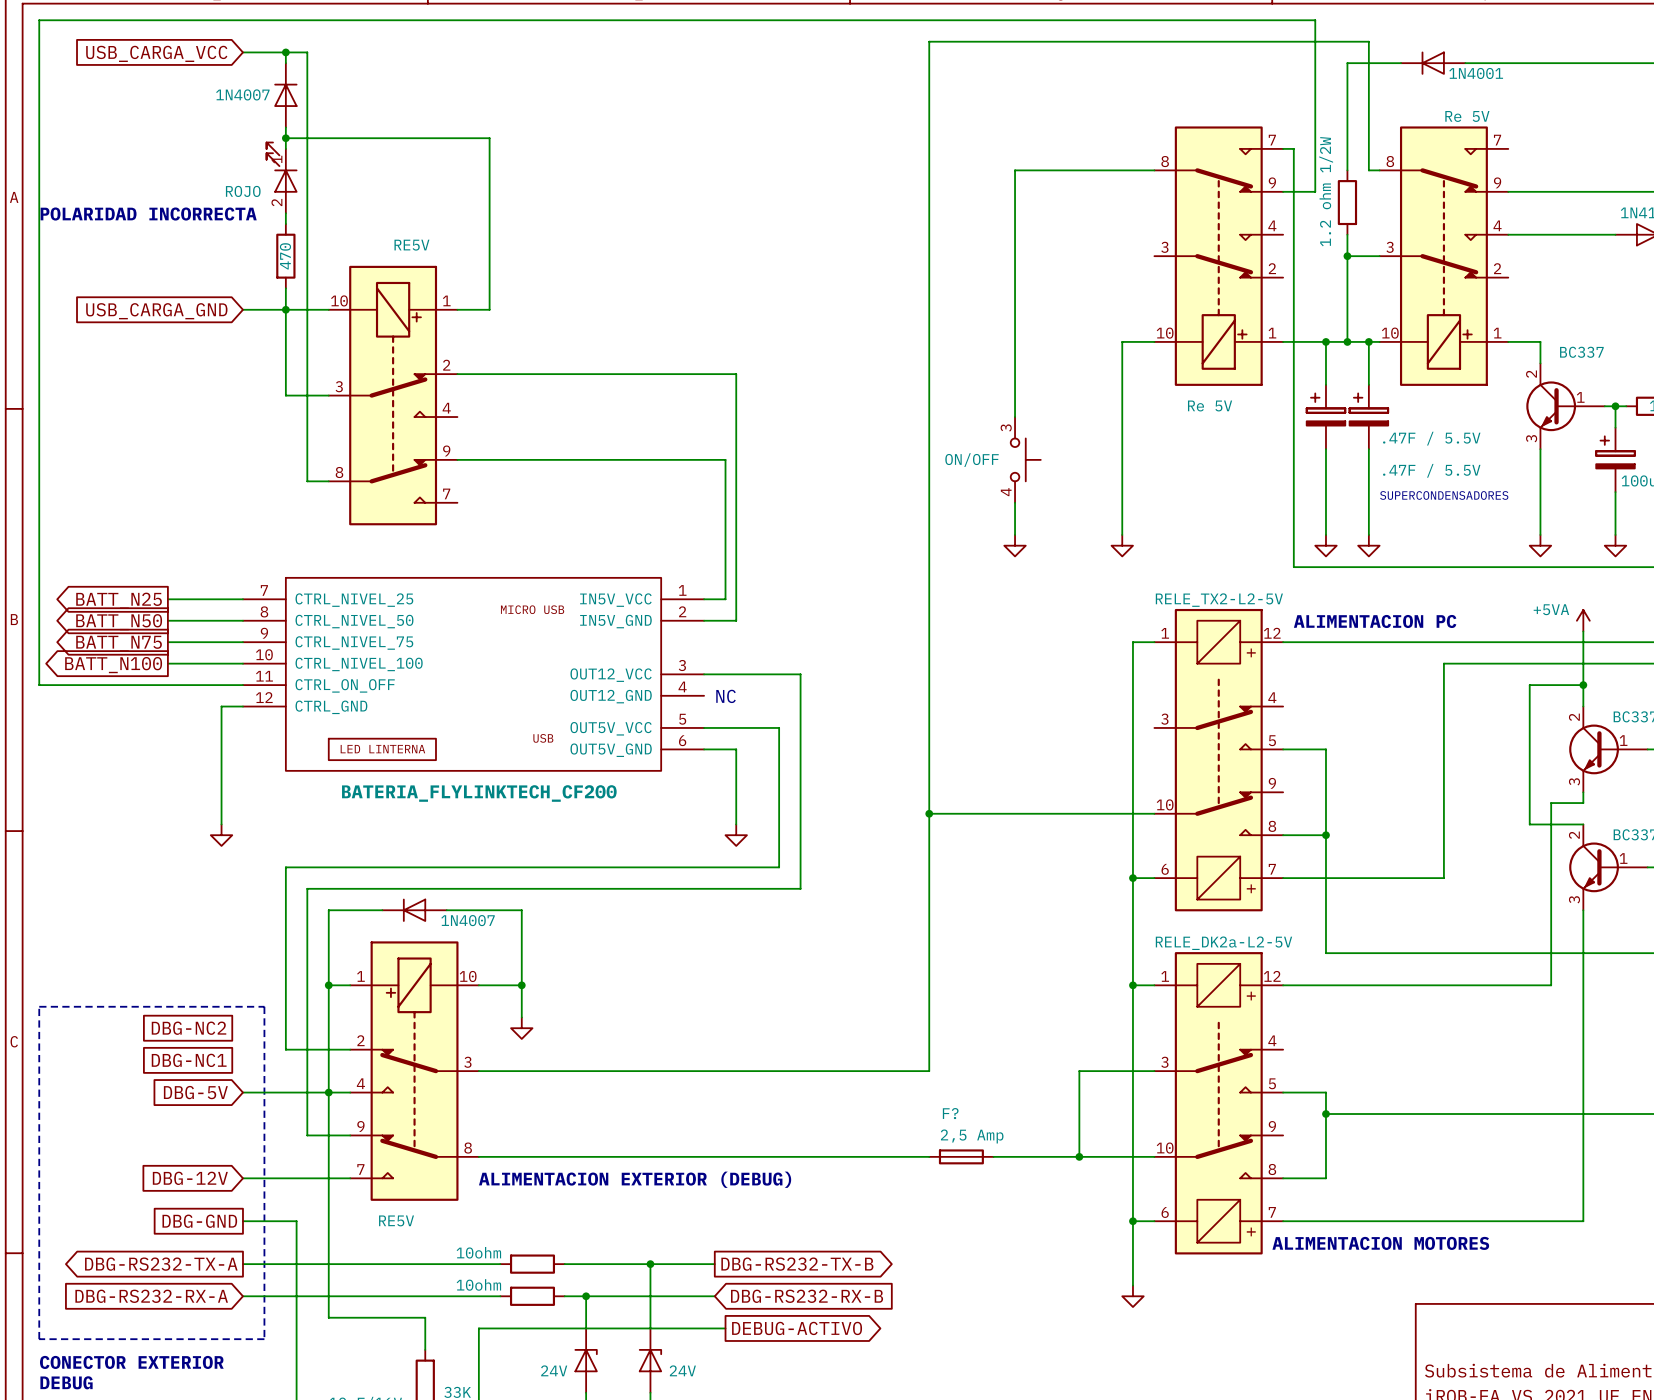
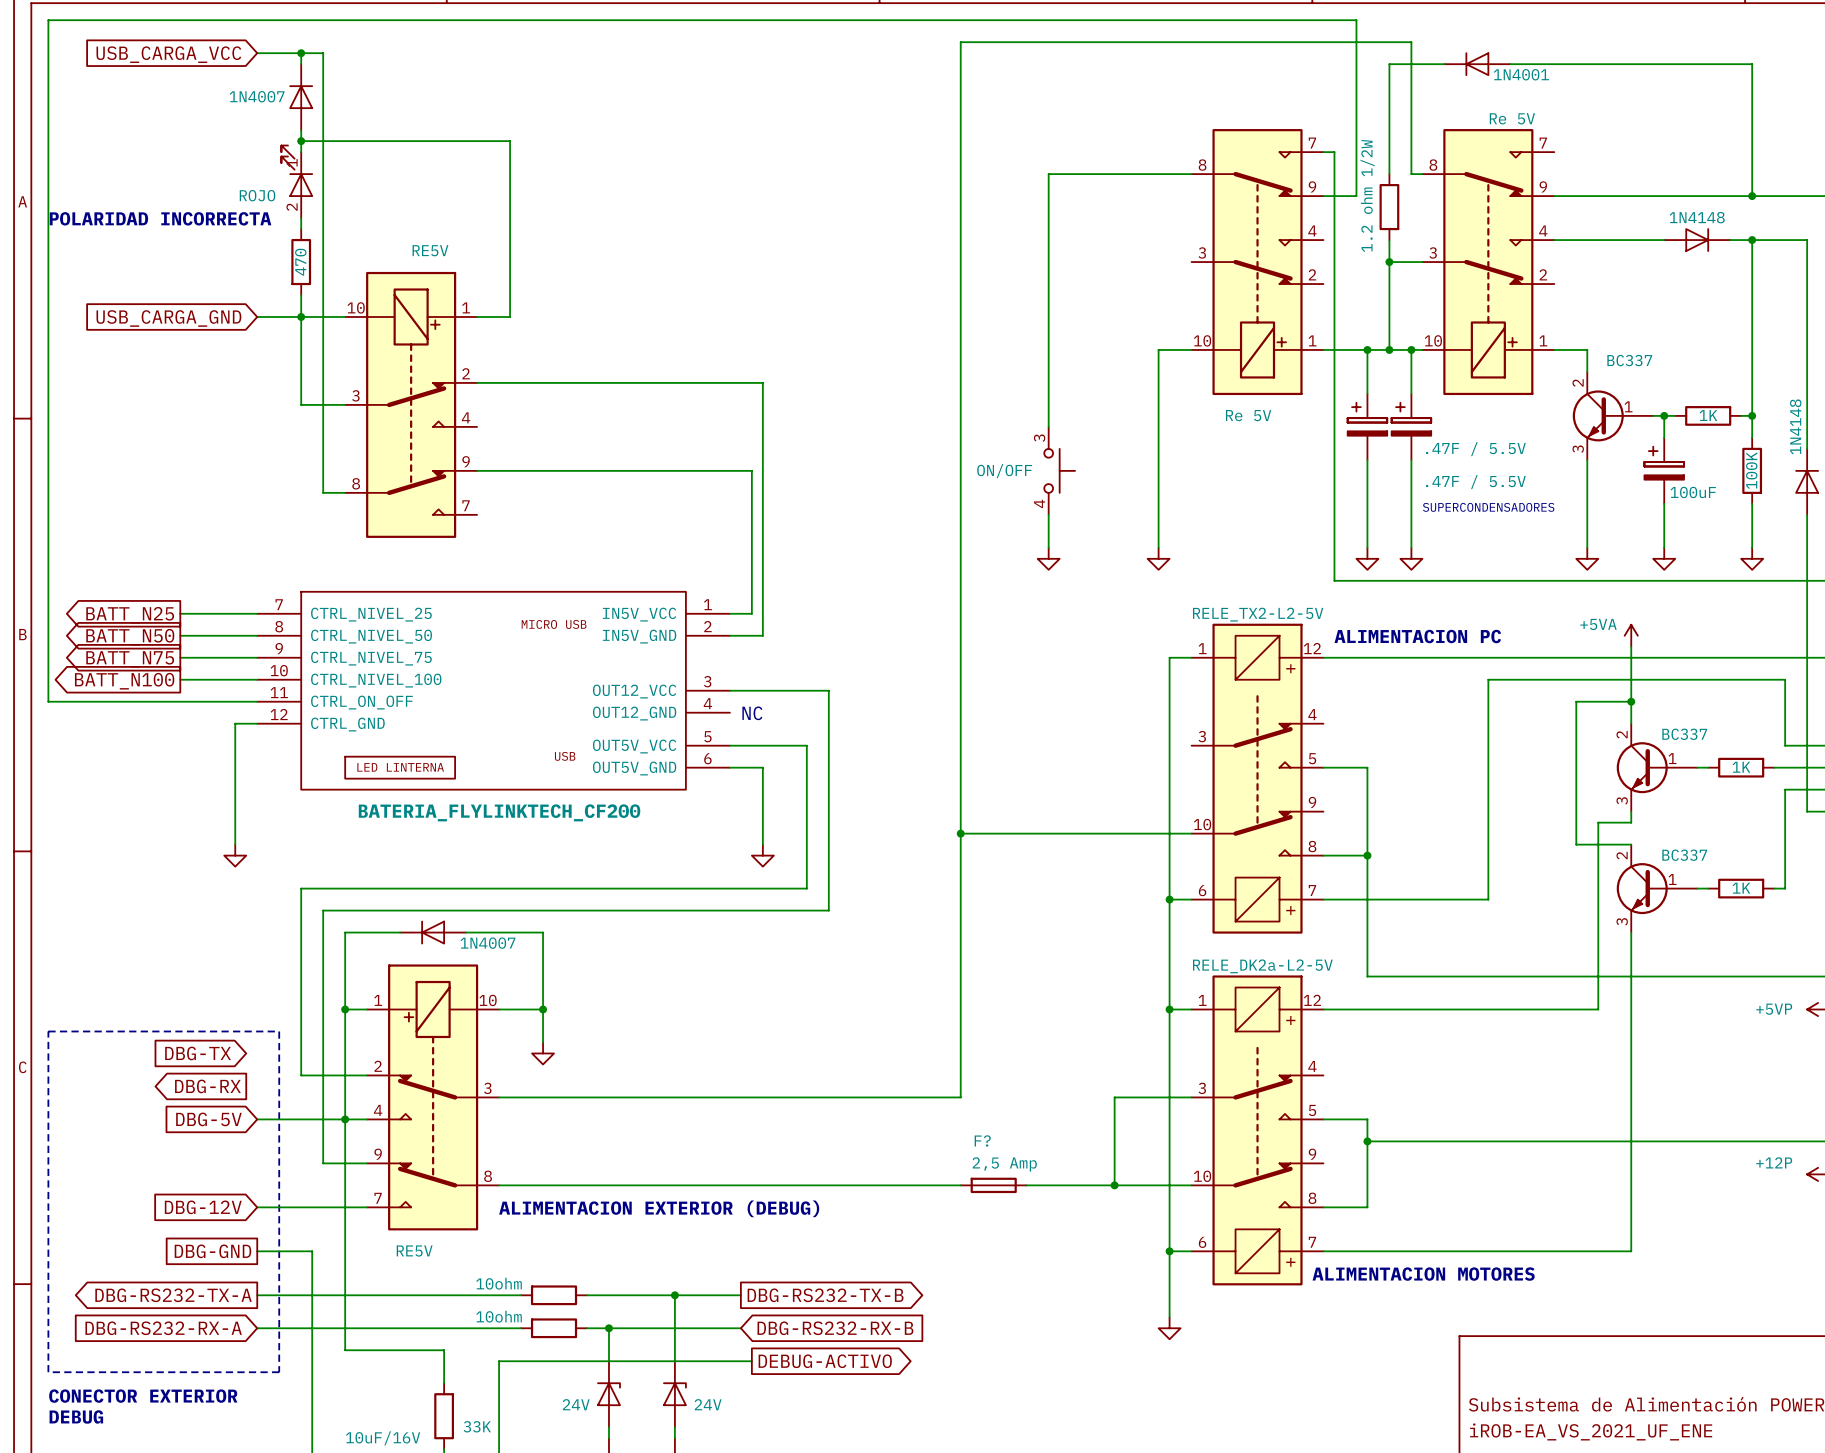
global label shape: passive (189, 1028) -> input (198, 1053)
global label: DBG-NC2 (189, 1028) -> DBG-TX (198, 1053)
global label shape: passive (189, 1060) -> output (207, 1086)
global label: DBG-NC1 (189, 1060) -> DBG-RX (207, 1086)

